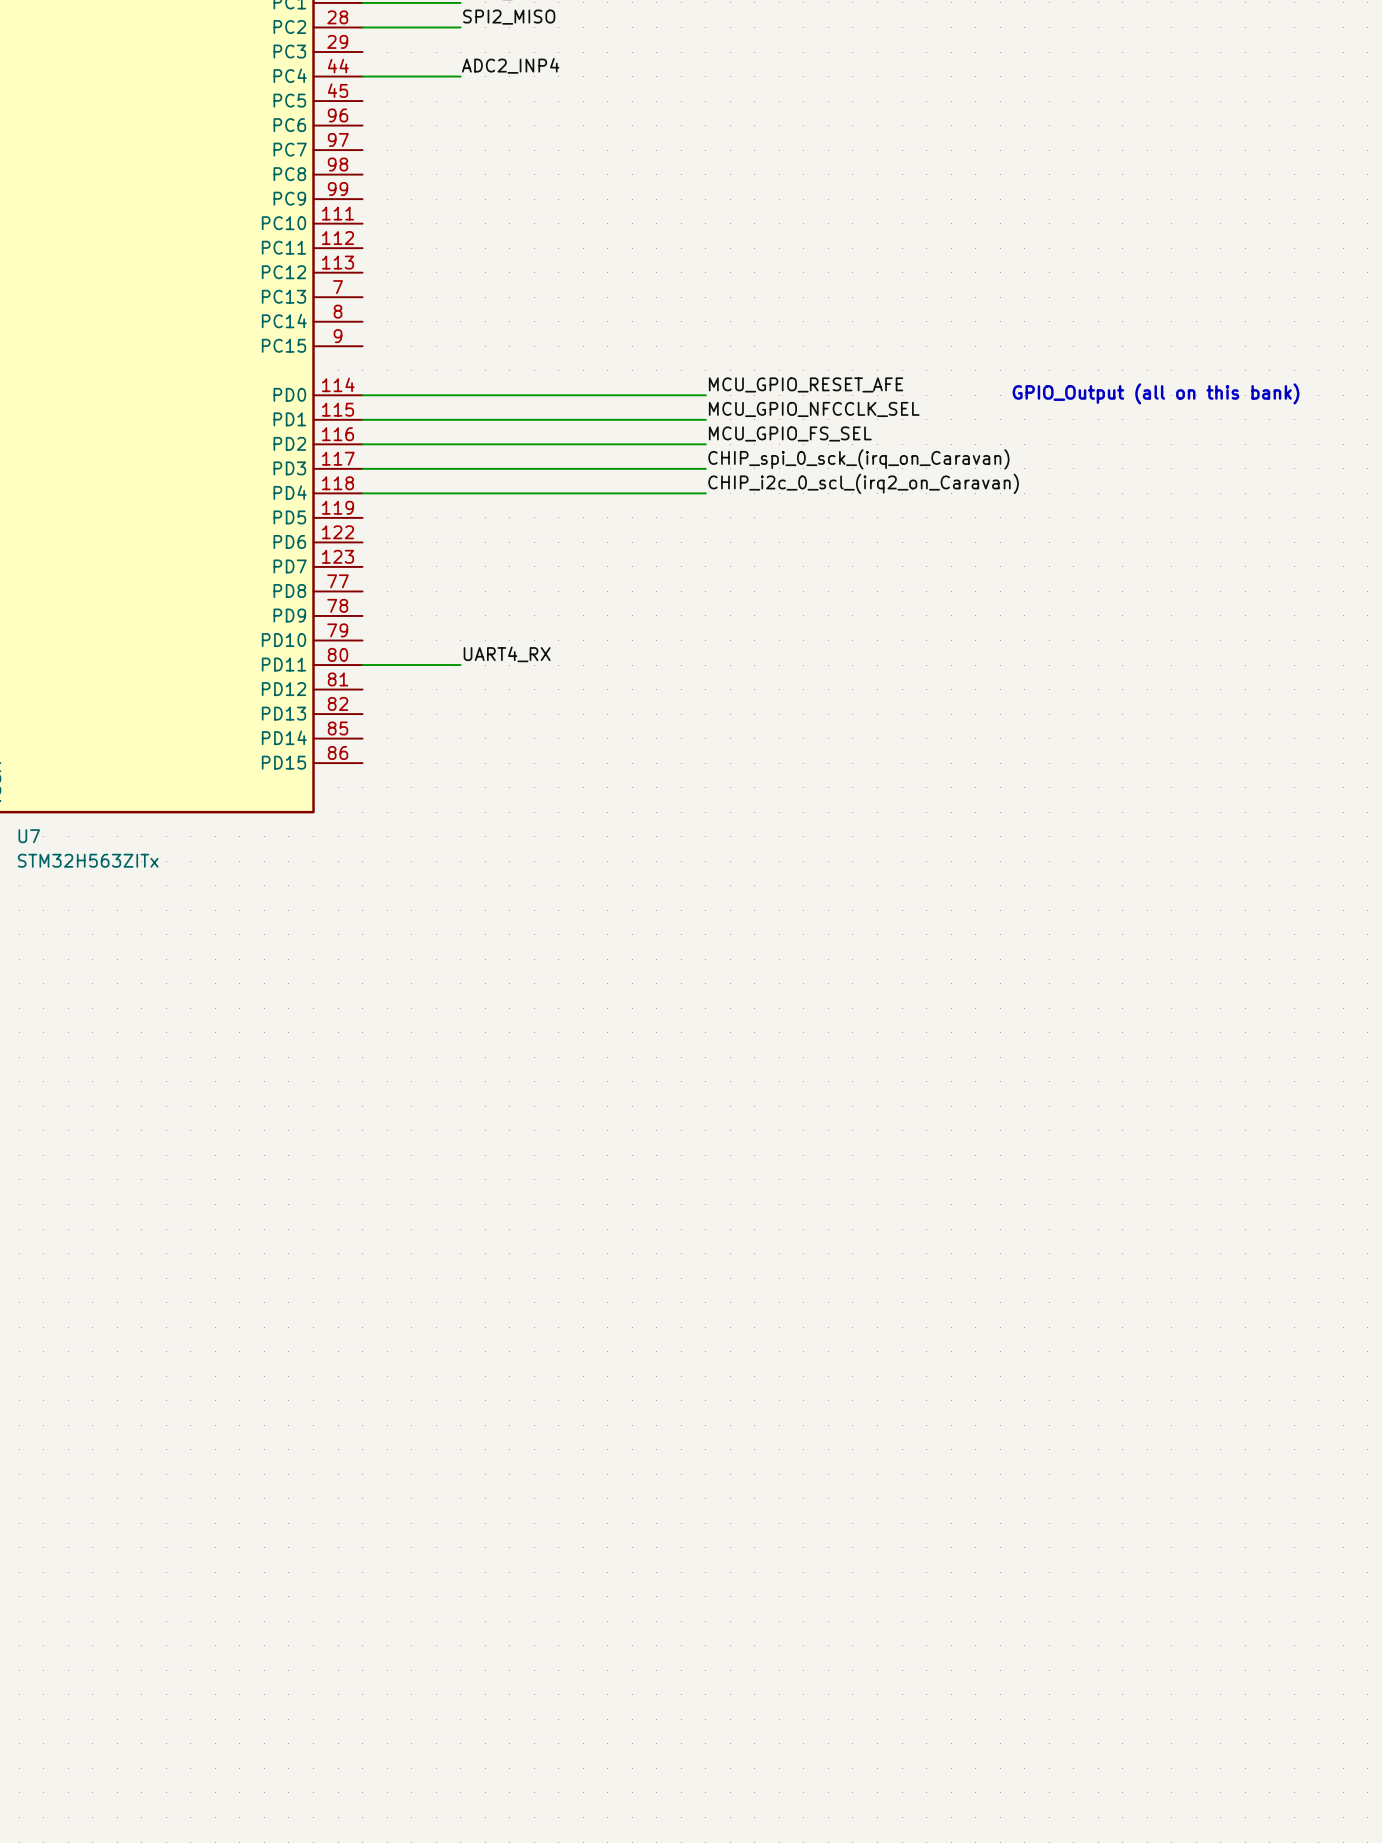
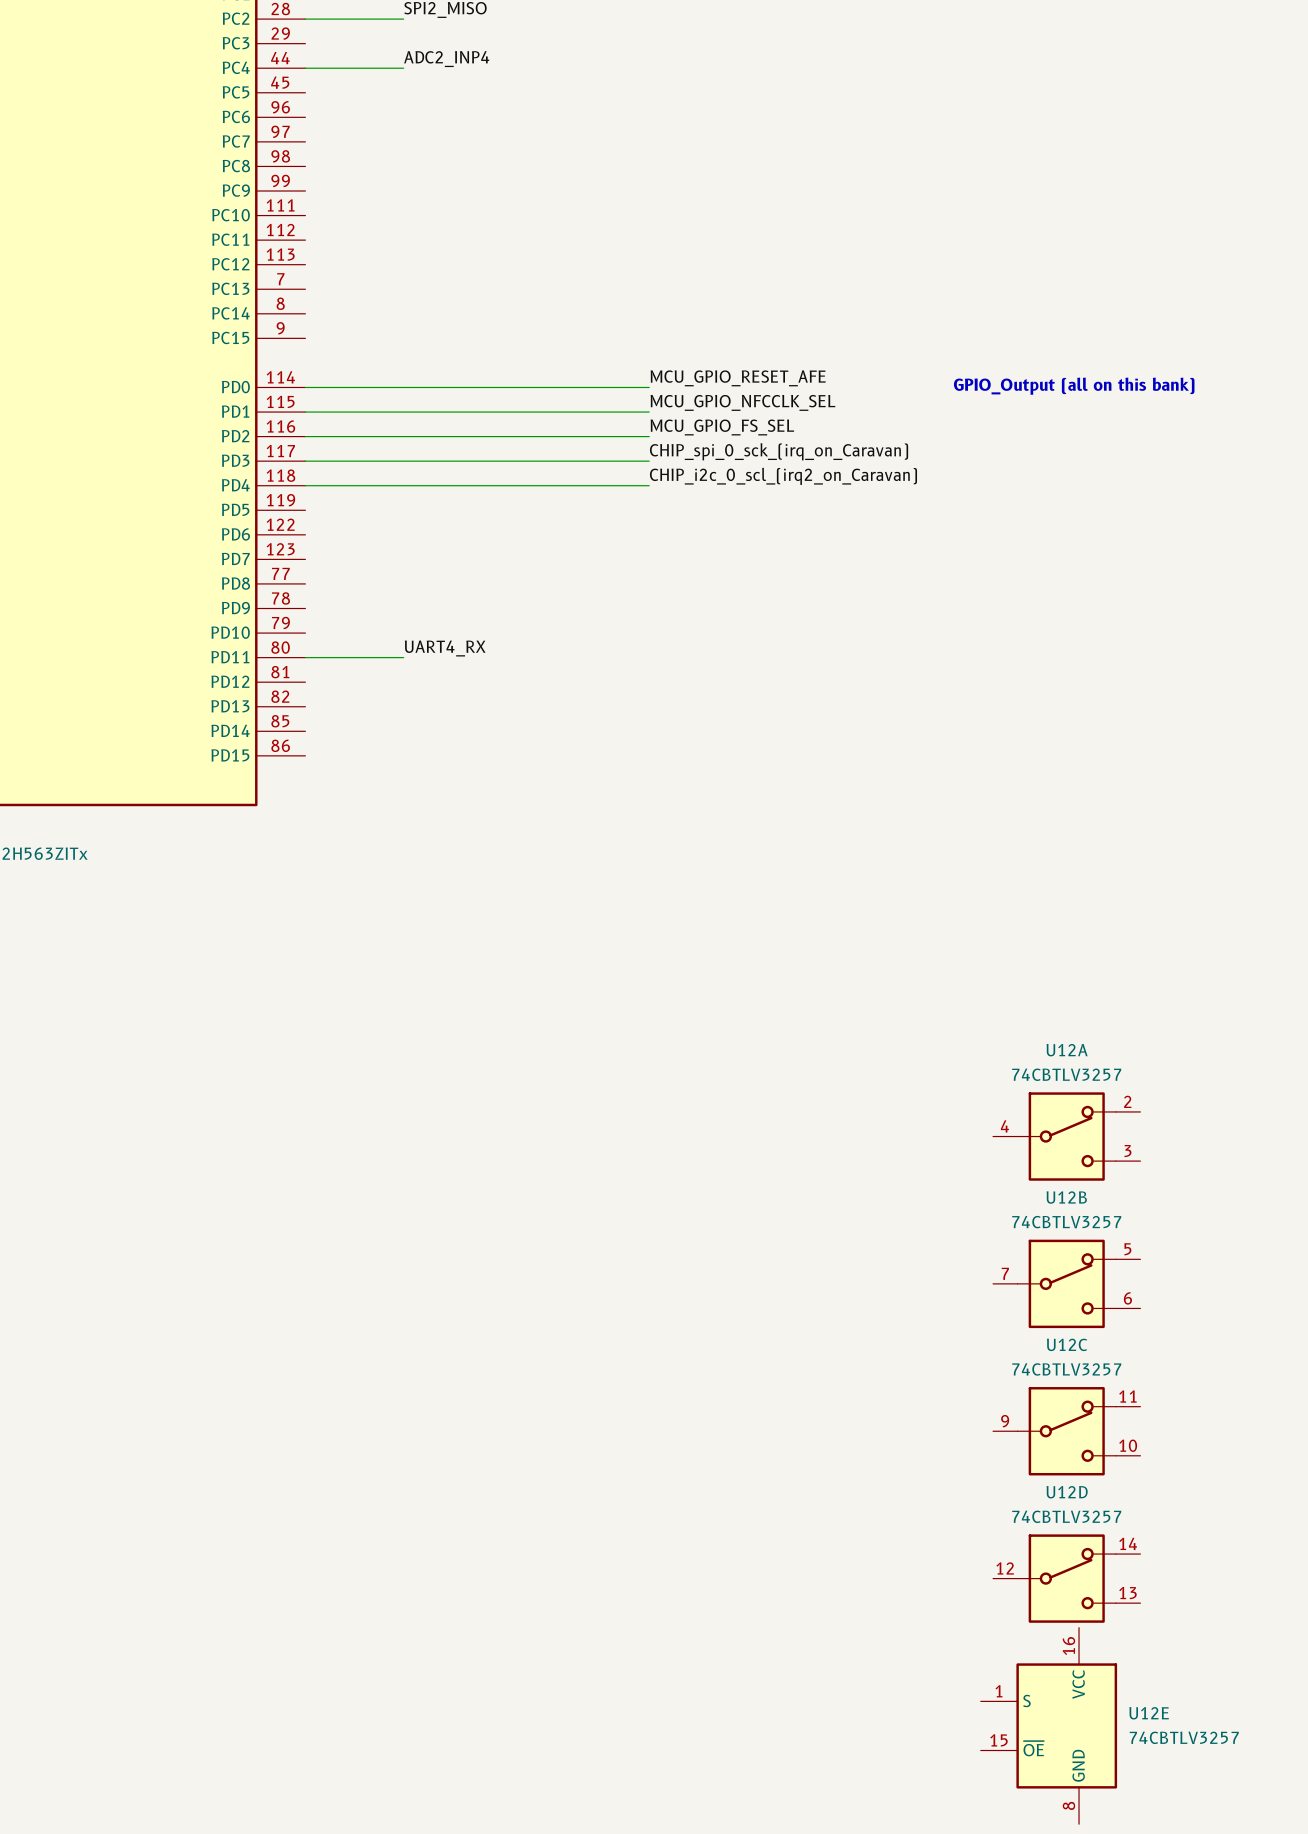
U12A: none -> 74CBTLV3257 (1066, 1136)
U12B: none -> 74CBTLV3257 (1066, 1283)
U12C: none -> 74CBTLV3257 (1066, 1431)
U12D: none -> 74CBTLV3257 (1066, 1578)
U12E: none -> 74CBTLV3257 (1048, 1725)

